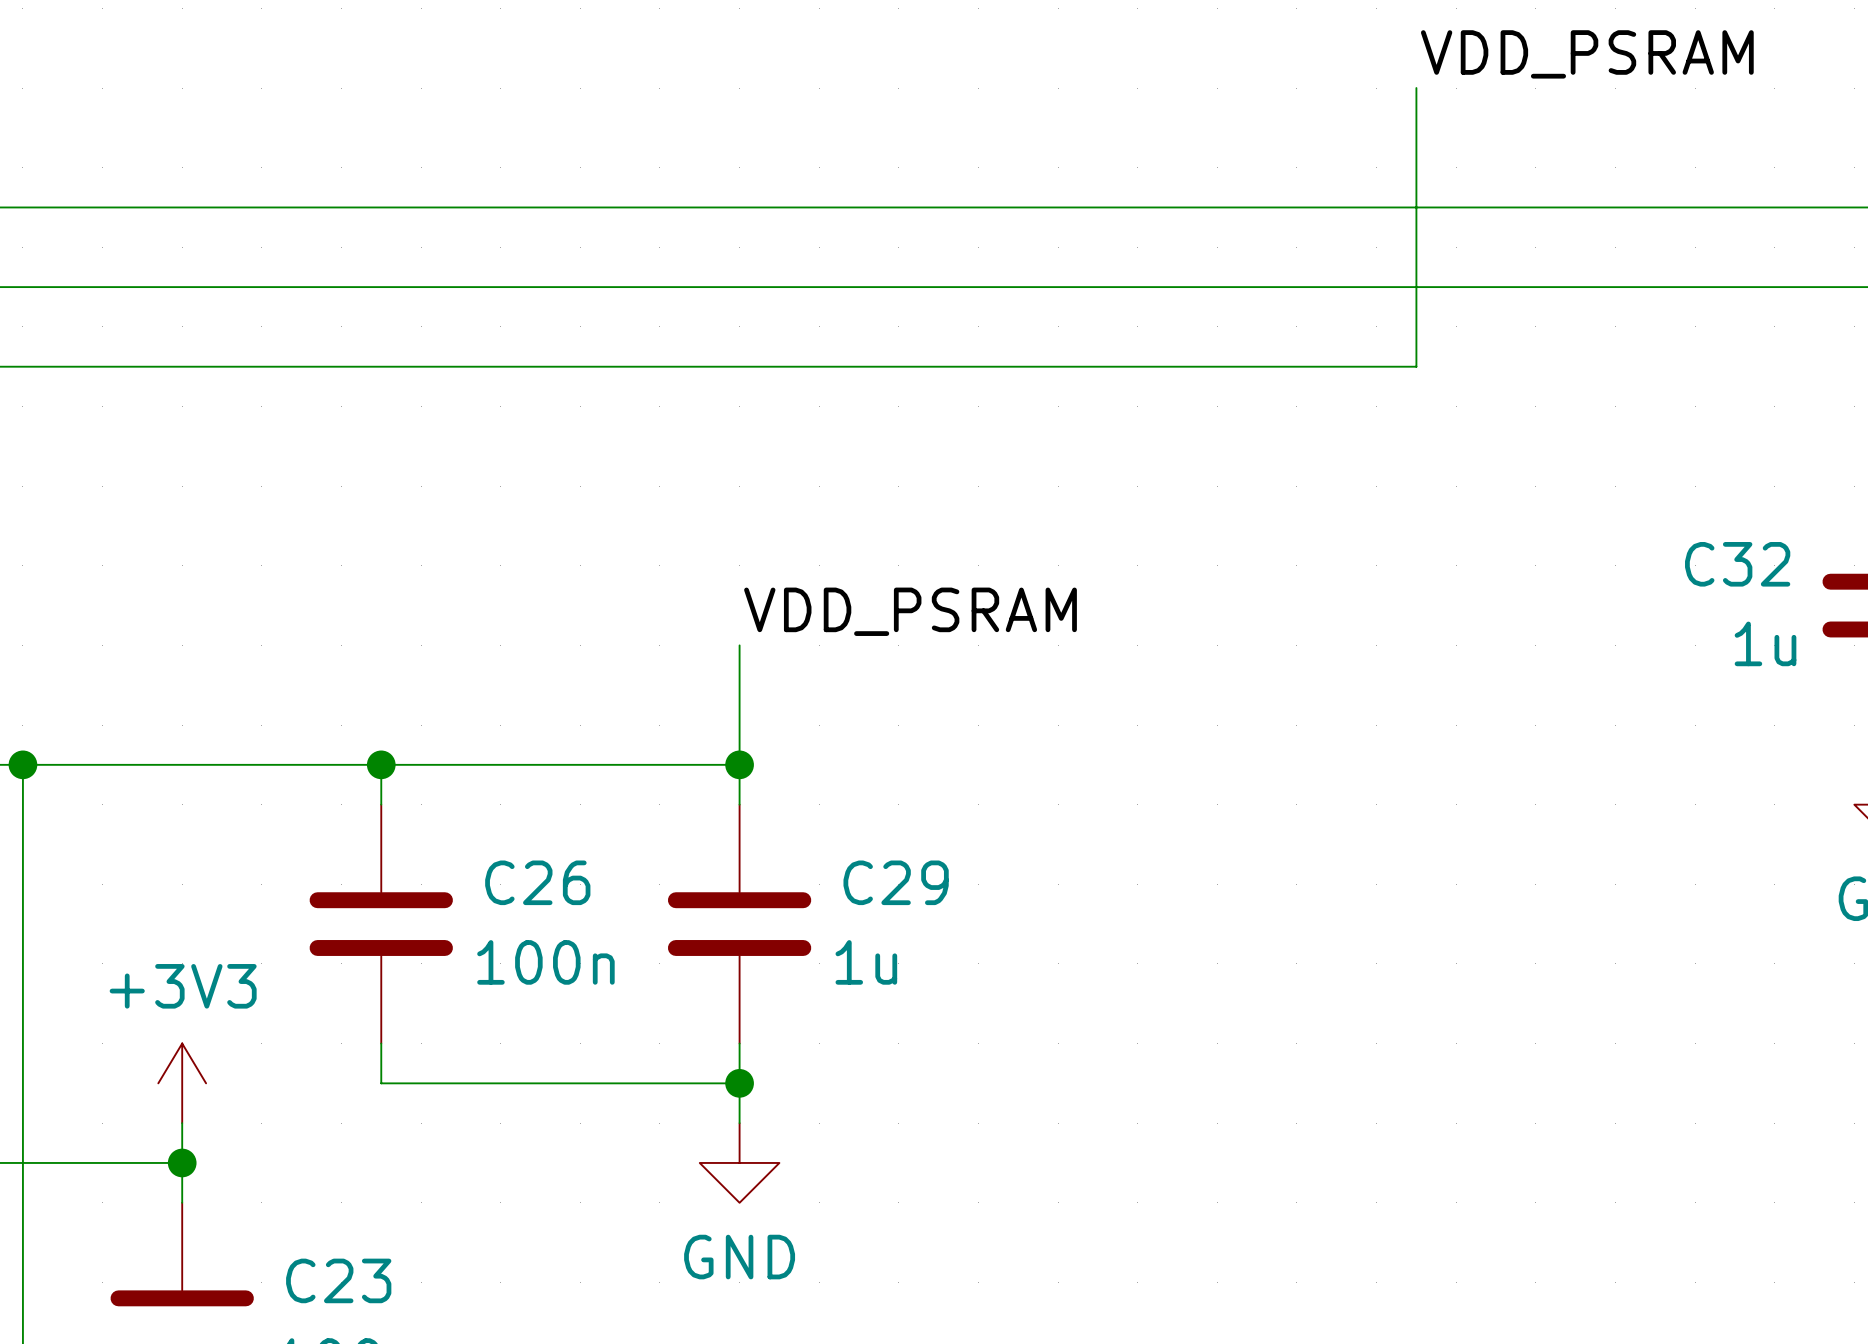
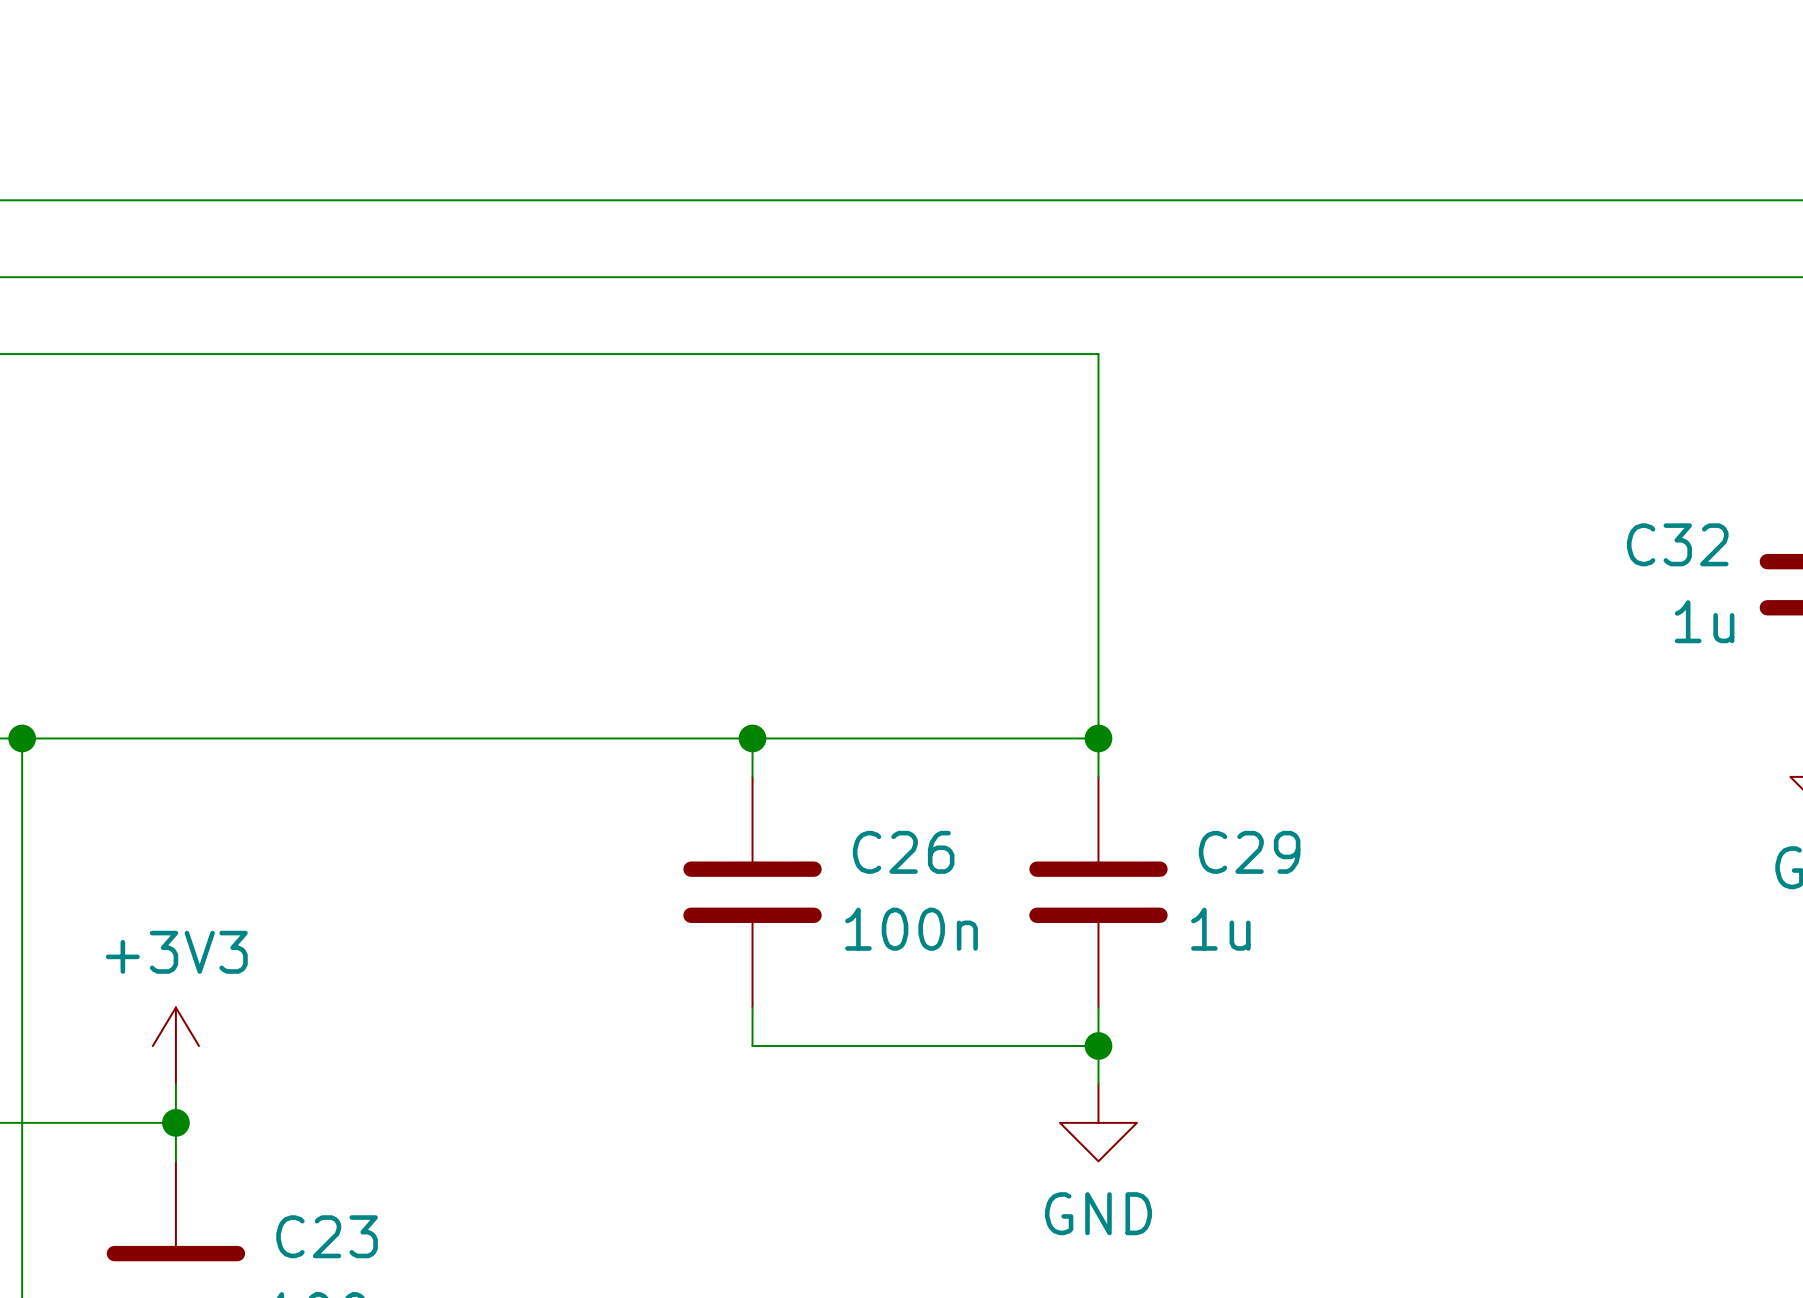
label: VDD_PSRAM (1587, 54) -> none
wire: (1416, 88) (1416, 366) (1137, 366) -> (1098, 776) (1098, 354)
label: VDD_PSRAM (910, 611) -> none
wire: (739, 645) (739, 804) -> none
wire: (381, 764) (381, 804) -> (752, 738) (752, 776)
junction: (381, 764) -> none
wire: none -> (714, 738) (1098, 738)
junction position: (739, 764) -> (752, 738)
junction: none -> (1098, 738)
C26 position: (381, 924) -> (752, 892)
C29 position: (739, 924) -> (1098, 892)
wire: (381, 1043) (381, 1083) (739, 1083) -> (752, 1007) (752, 1045) (1098, 1045)
wire: (739, 1043) (739, 1123) -> (1098, 1007) (1098, 1084)
junction: (739, 1083) -> none
junction: none -> (1098, 1045)
power symbol position: GND (739, 1162) -> GND (1098, 1122)

